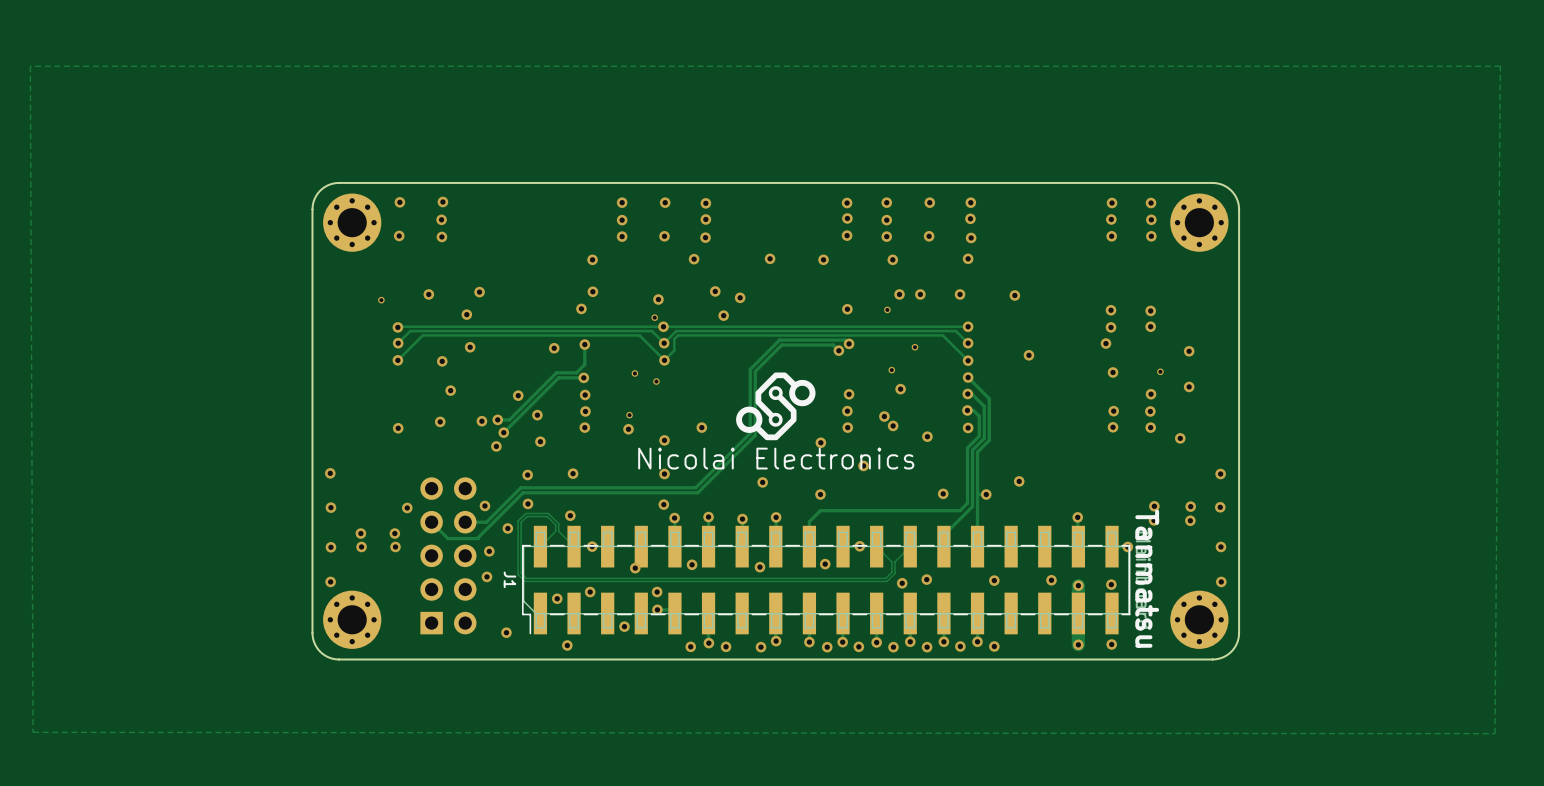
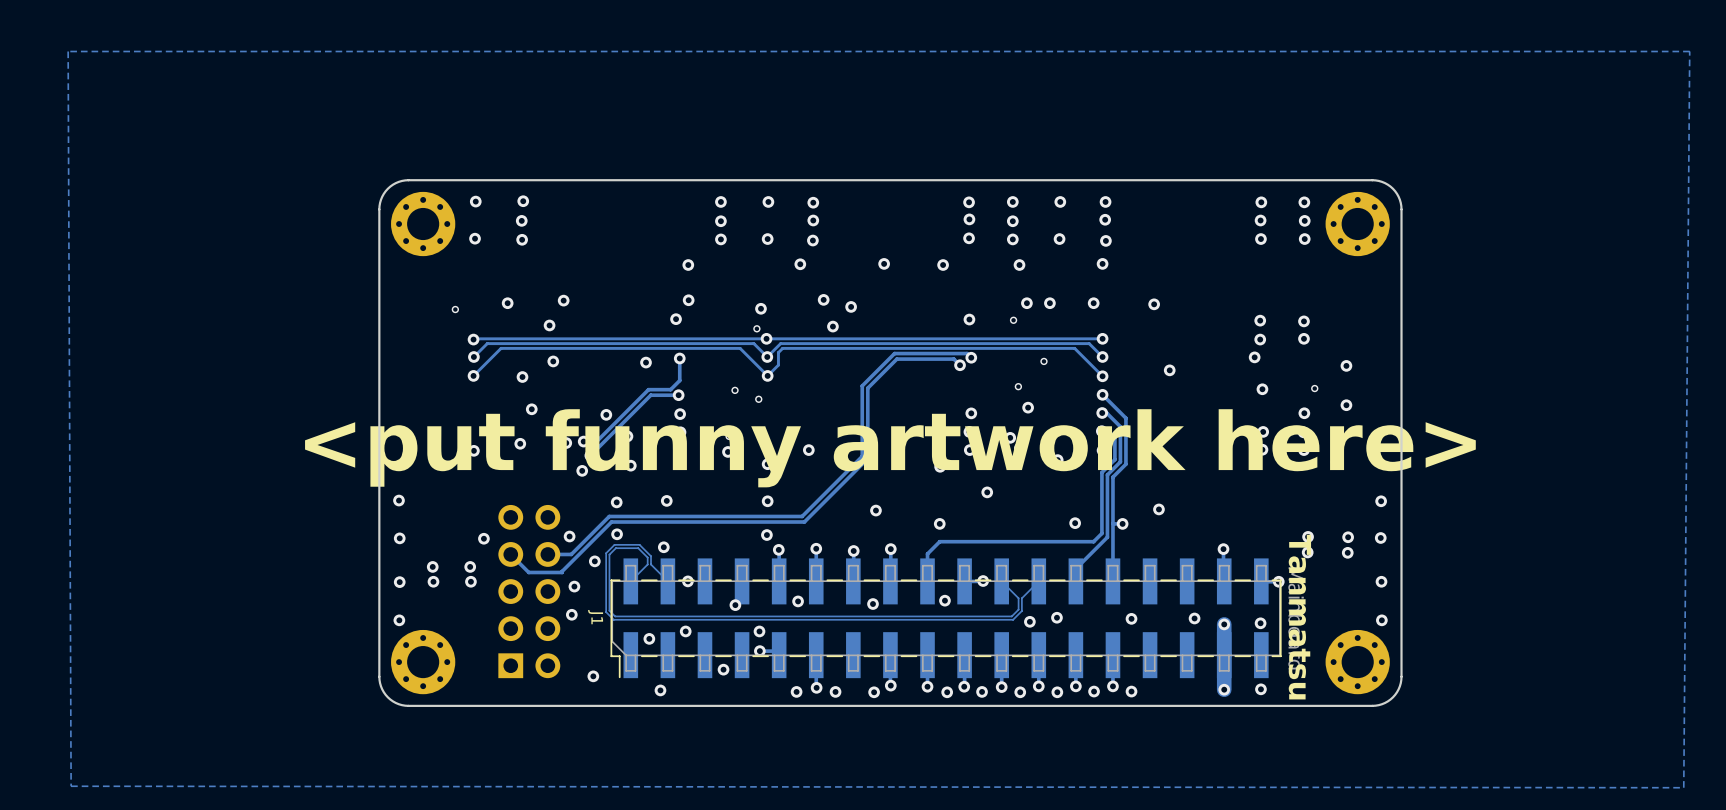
drawing: [736, 372, 816, 441] -> none
text: none -> <put funny artwork here> (890, 448)
text: Nicolai Electronics (776, 458) -> none

